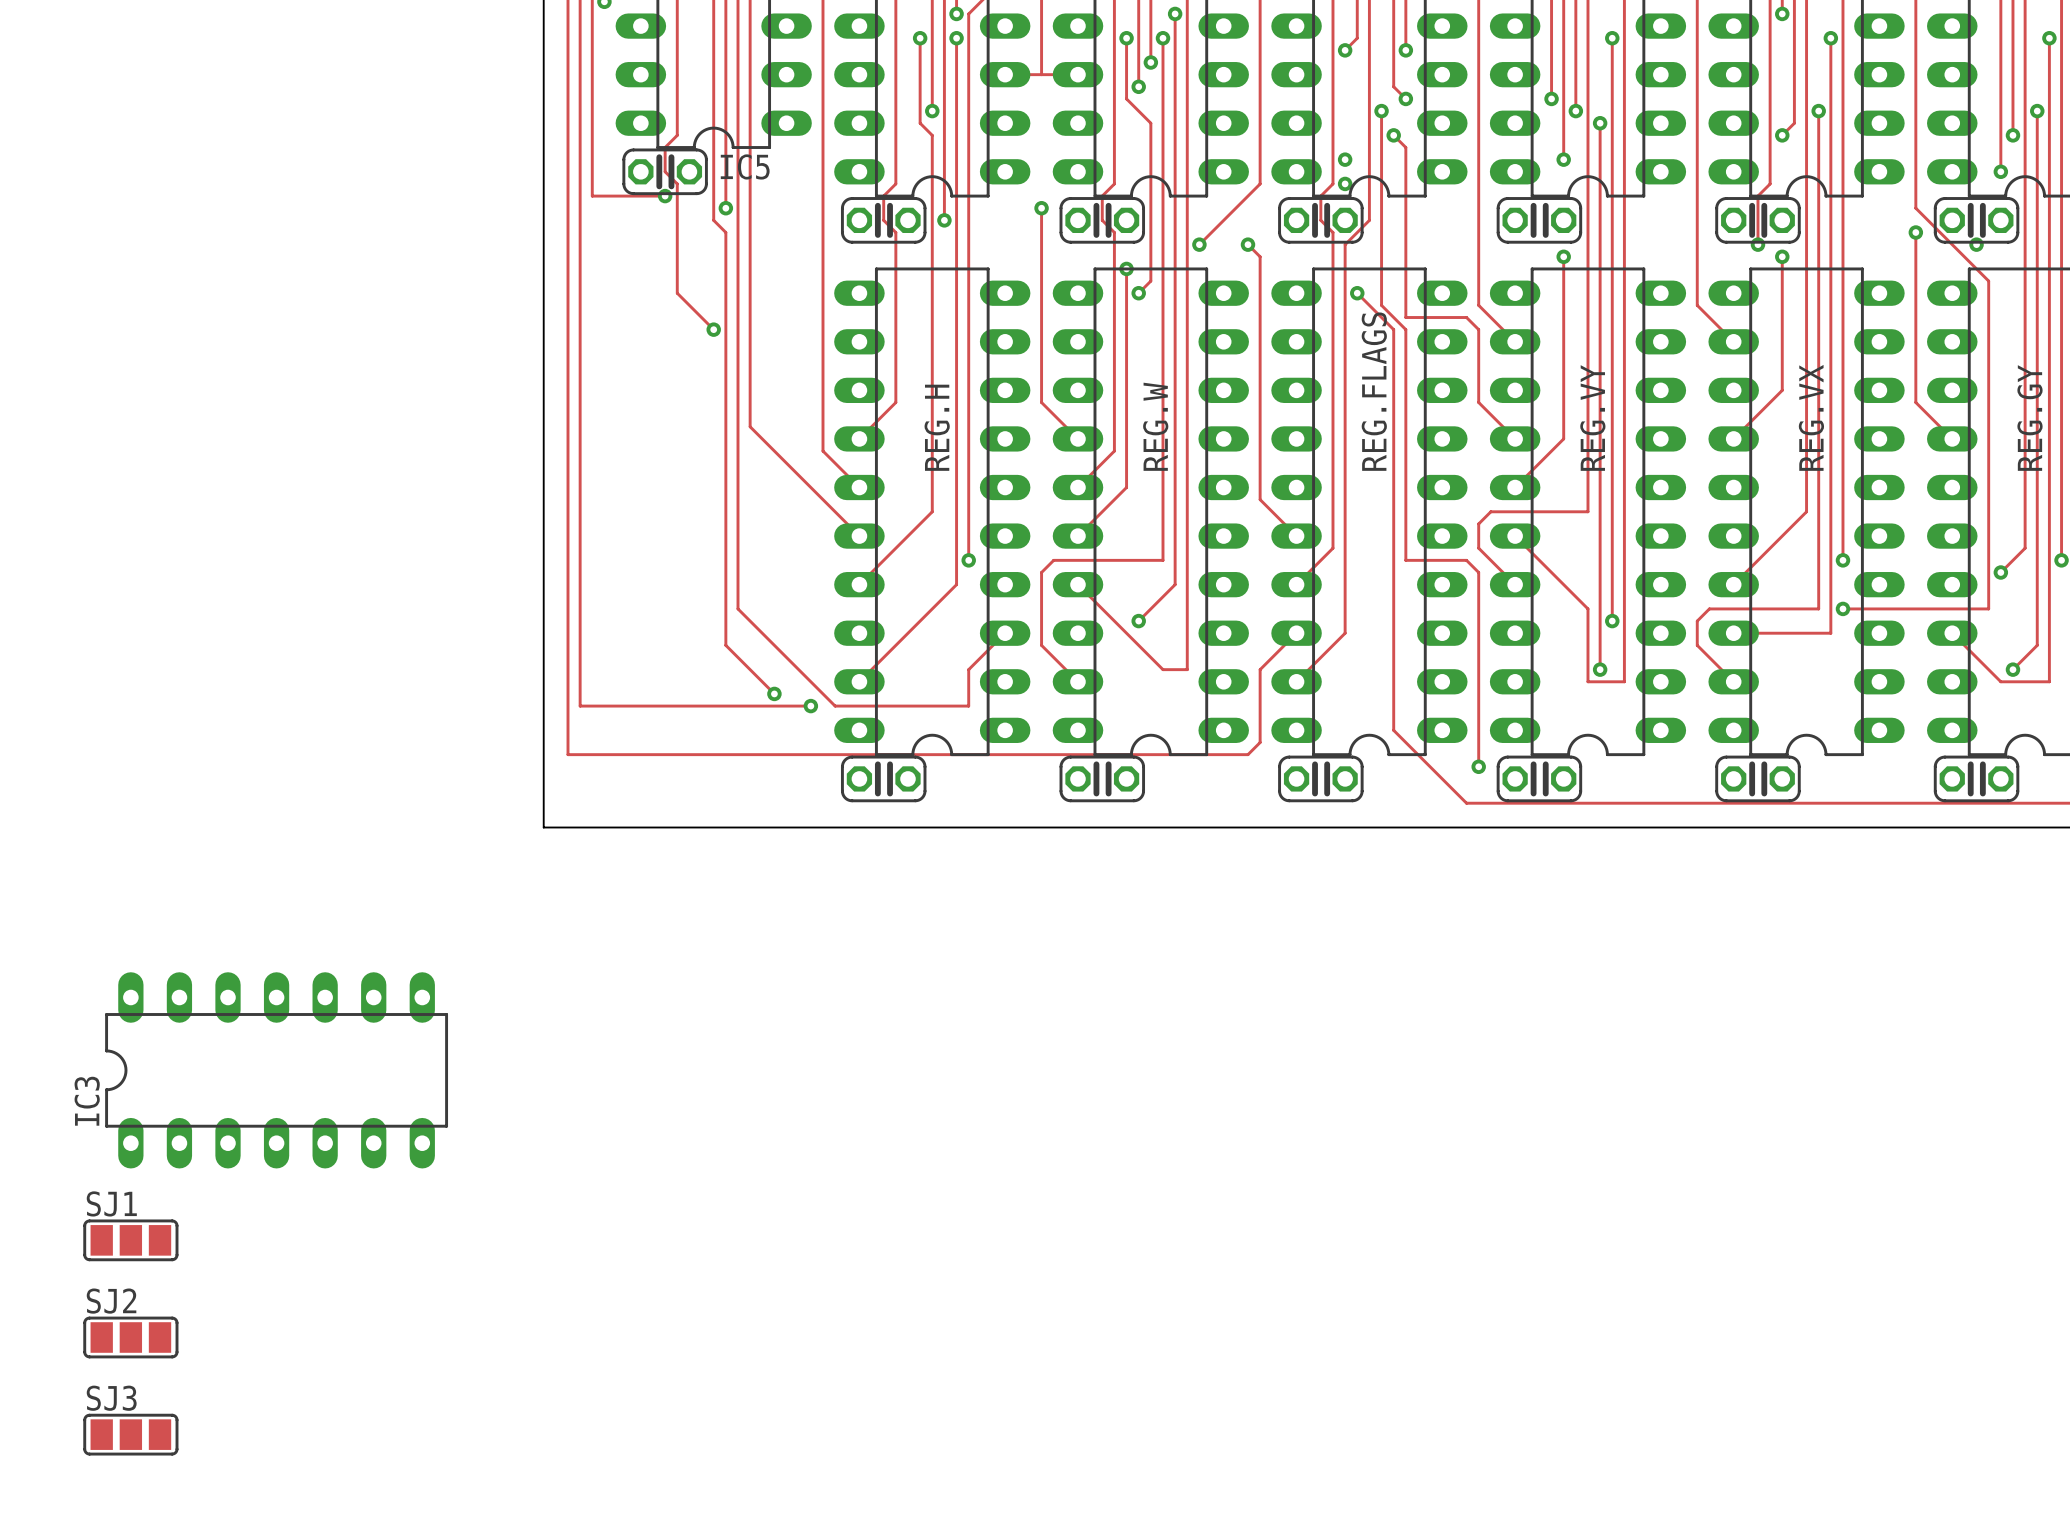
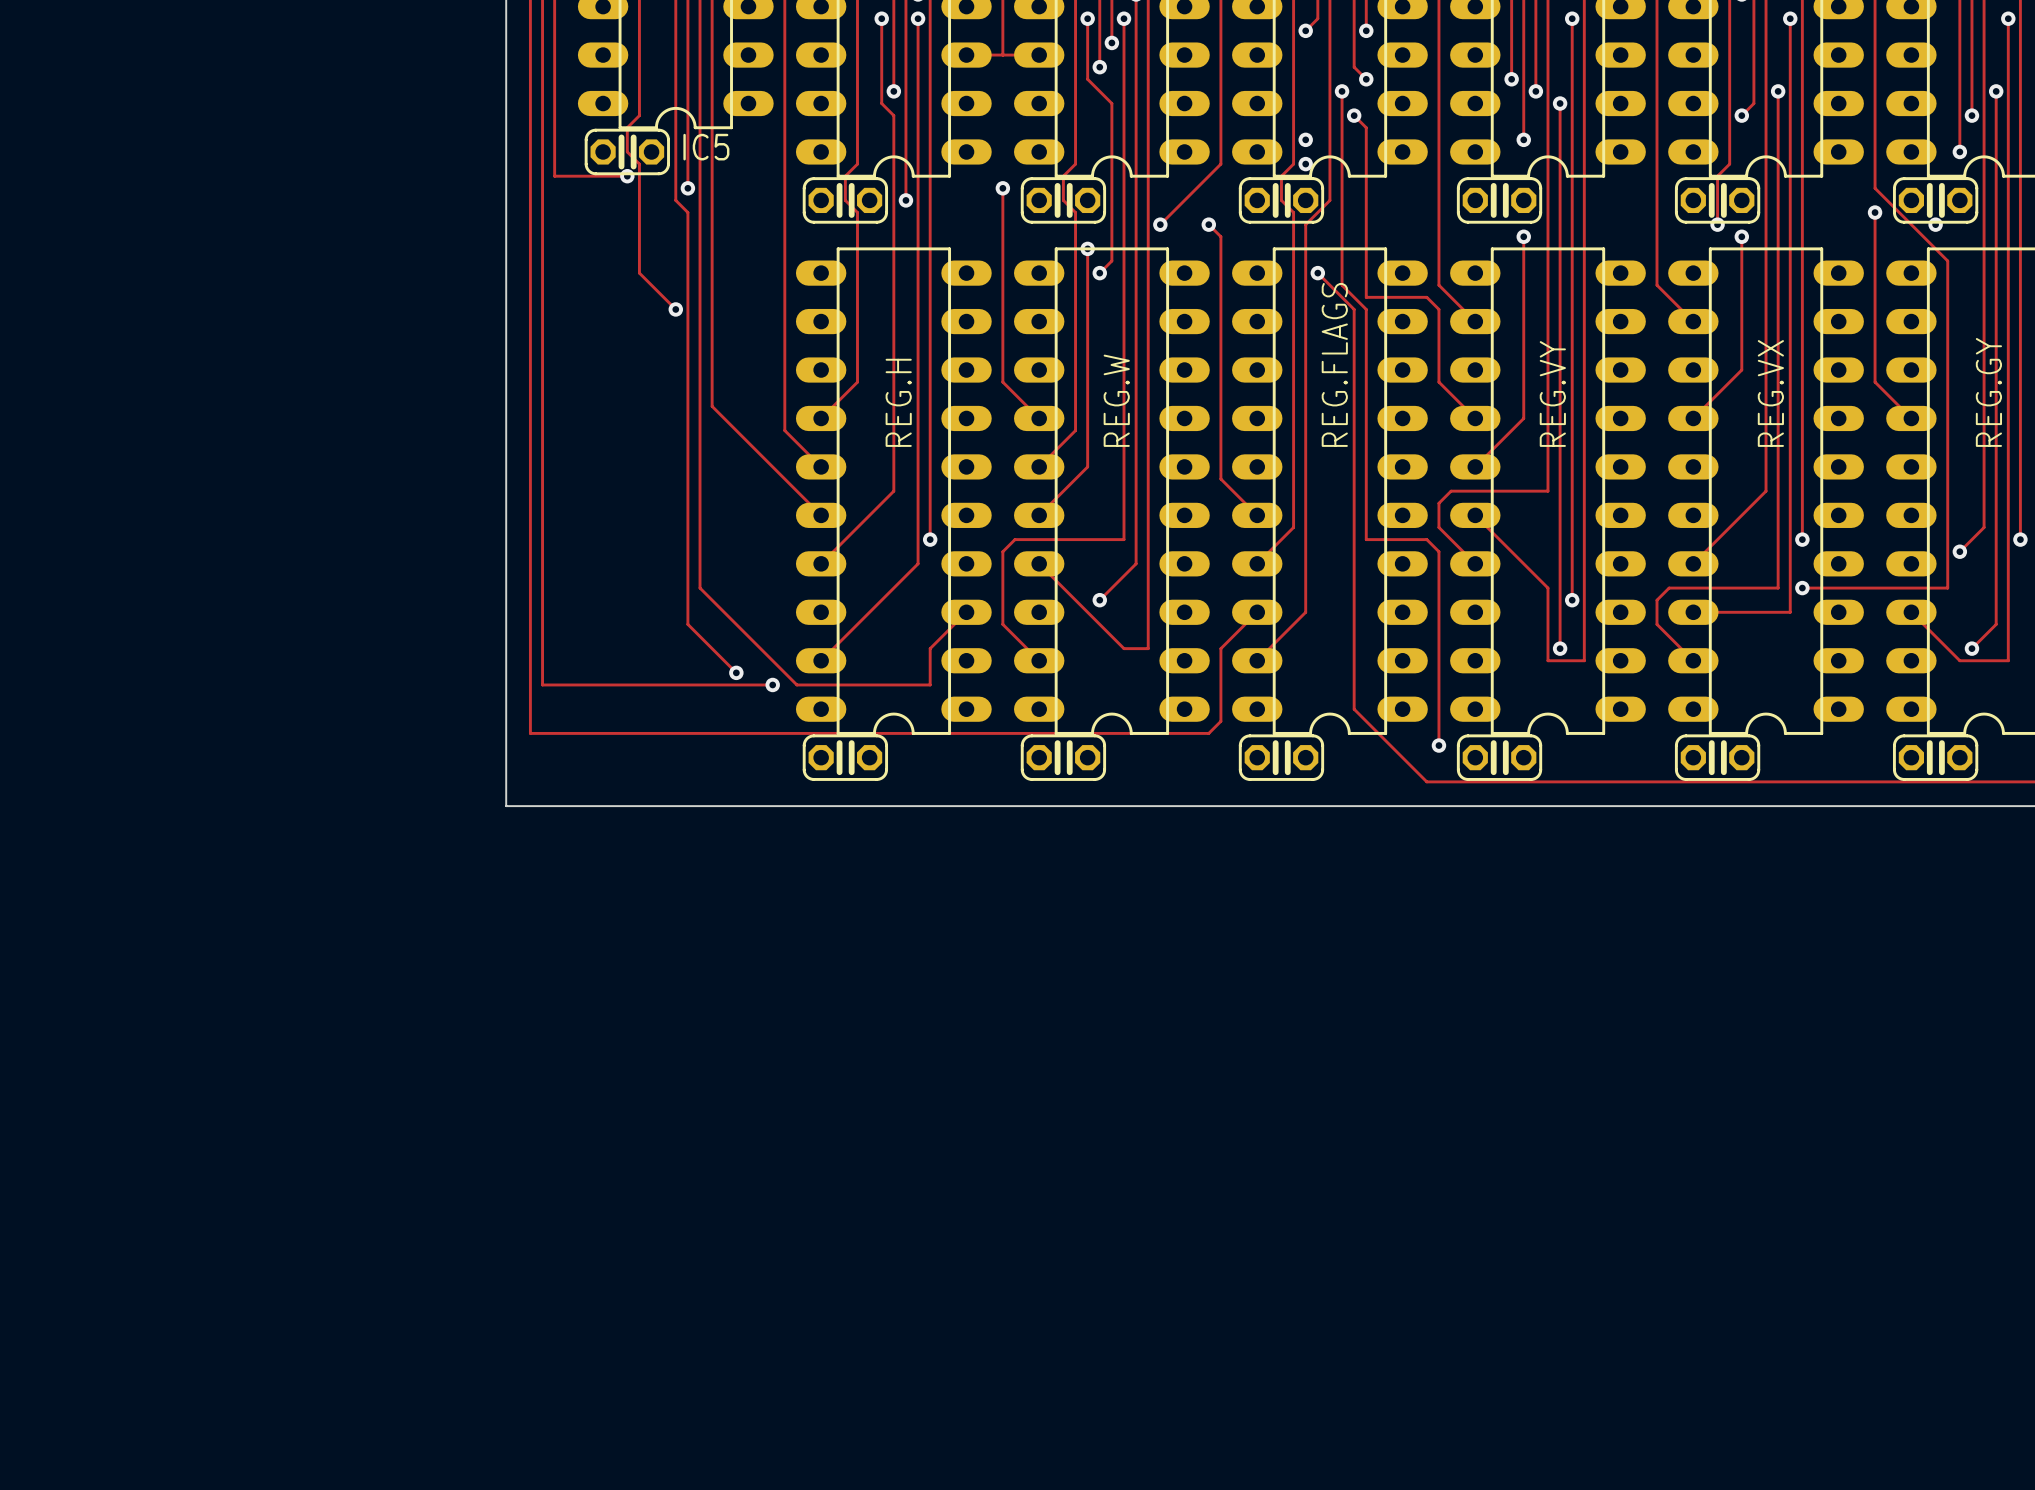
IC3: (276, 1070) -> none
SJ1: (130, 1240) -> none
SJ2: (130, 1337) -> none
SJ3: (130, 1434) -> none

